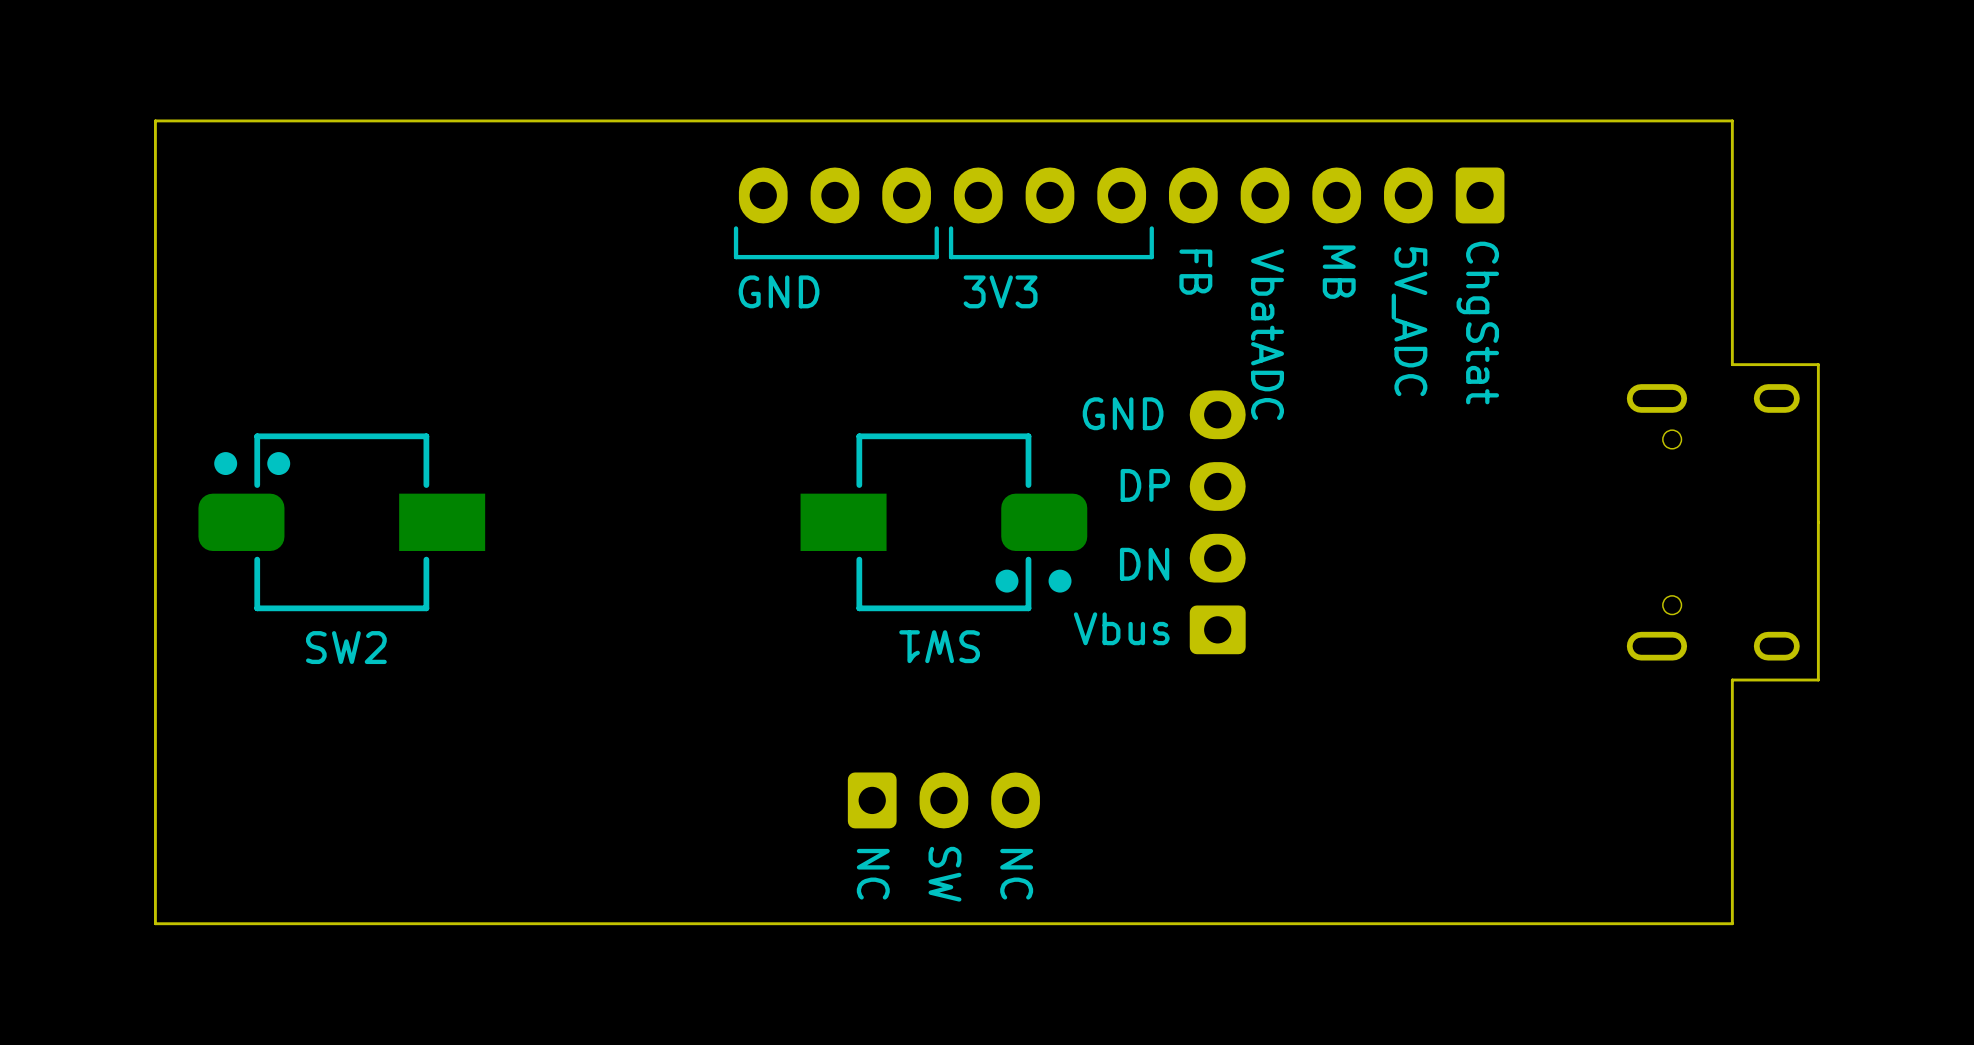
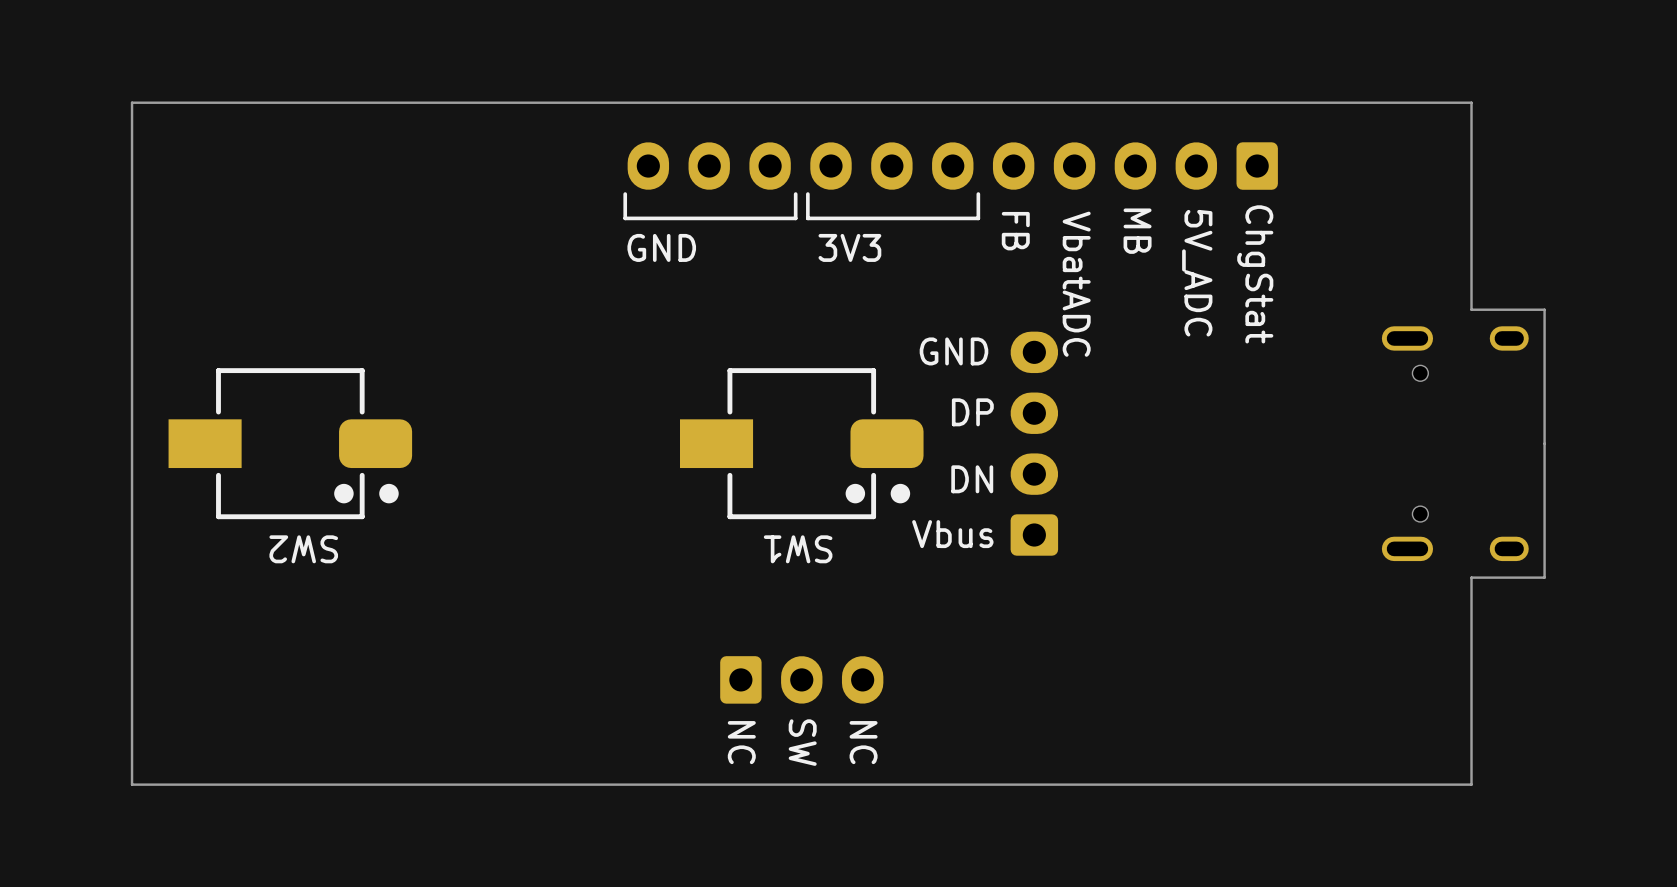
SW2 rotation: 0° (341, 522) -> 180° (290, 443)

